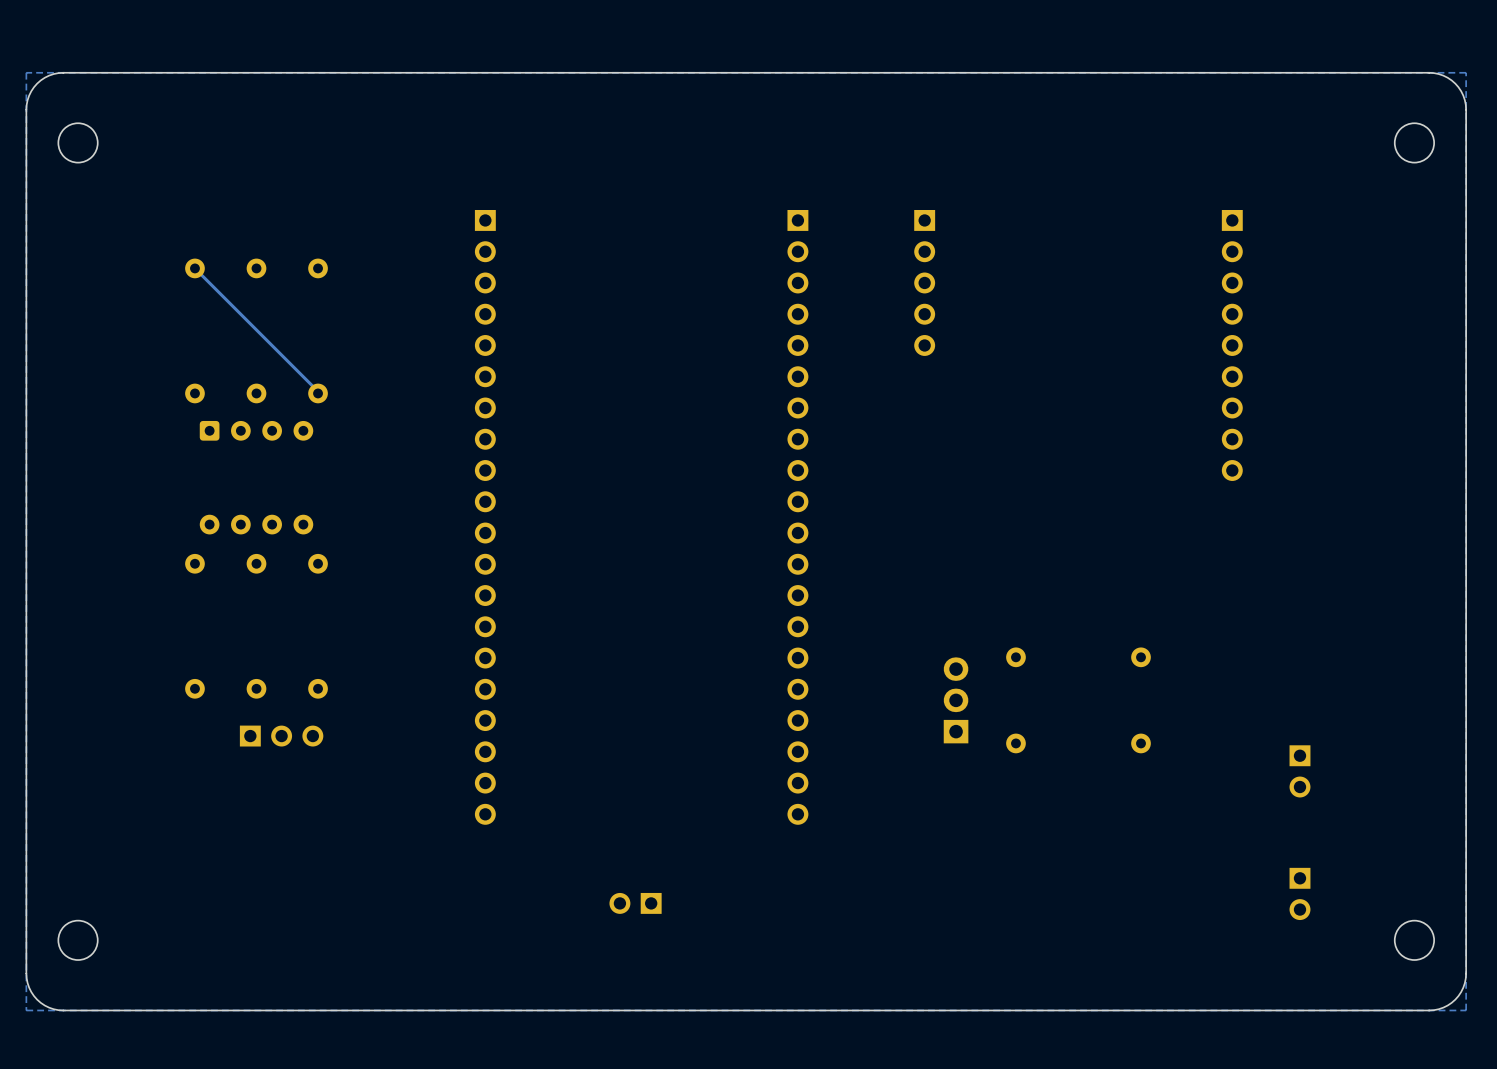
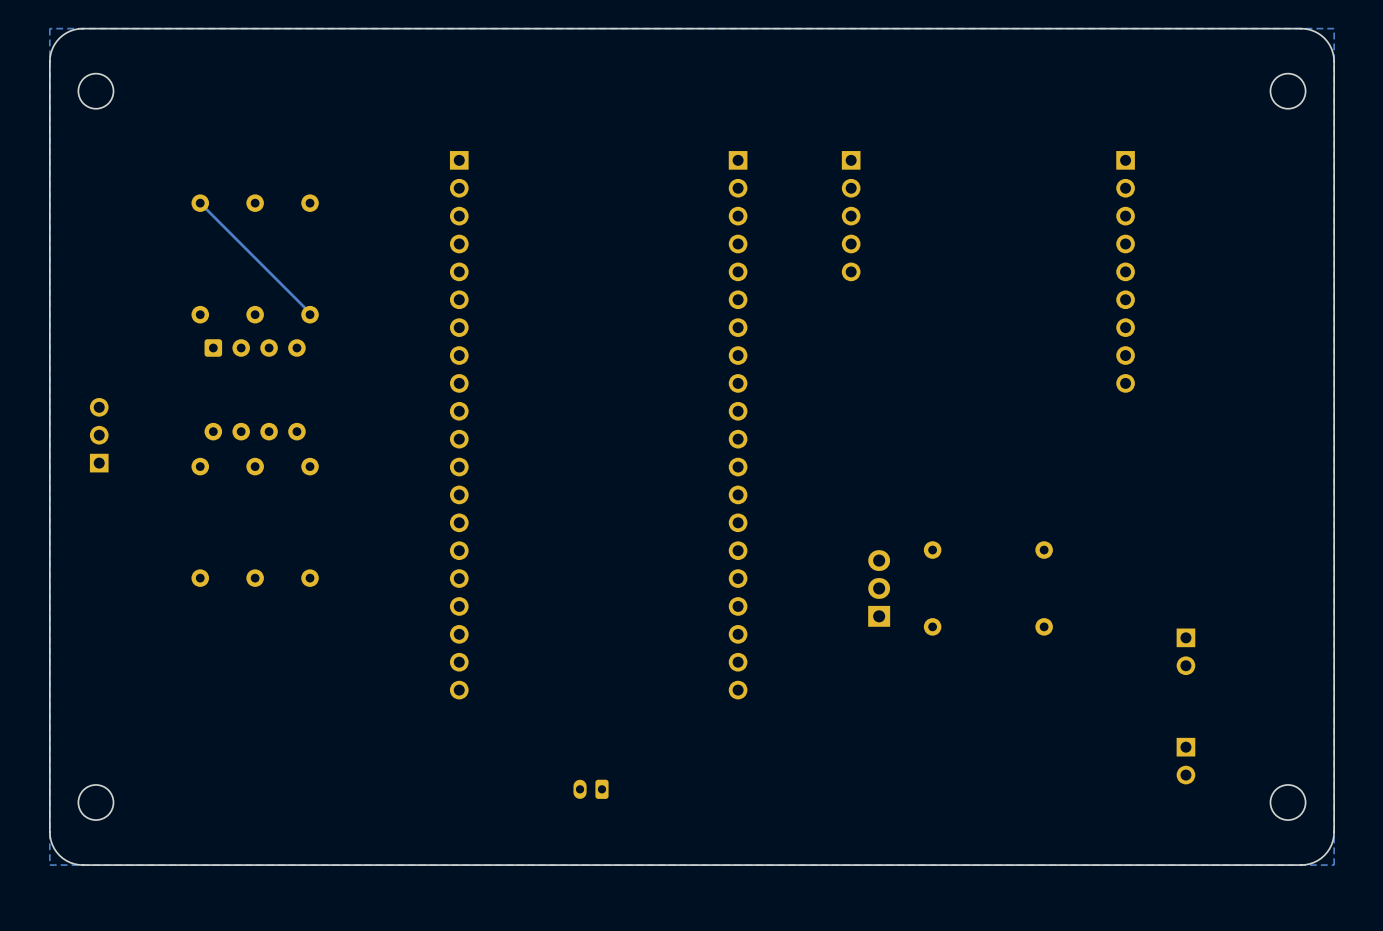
part rotation: 0° (281, 736) -> 90° counterclockwise (99, 435)
part position: (281, 736) -> (99, 435)
part: (635, 903) -> none
part: none -> (591, 789)

